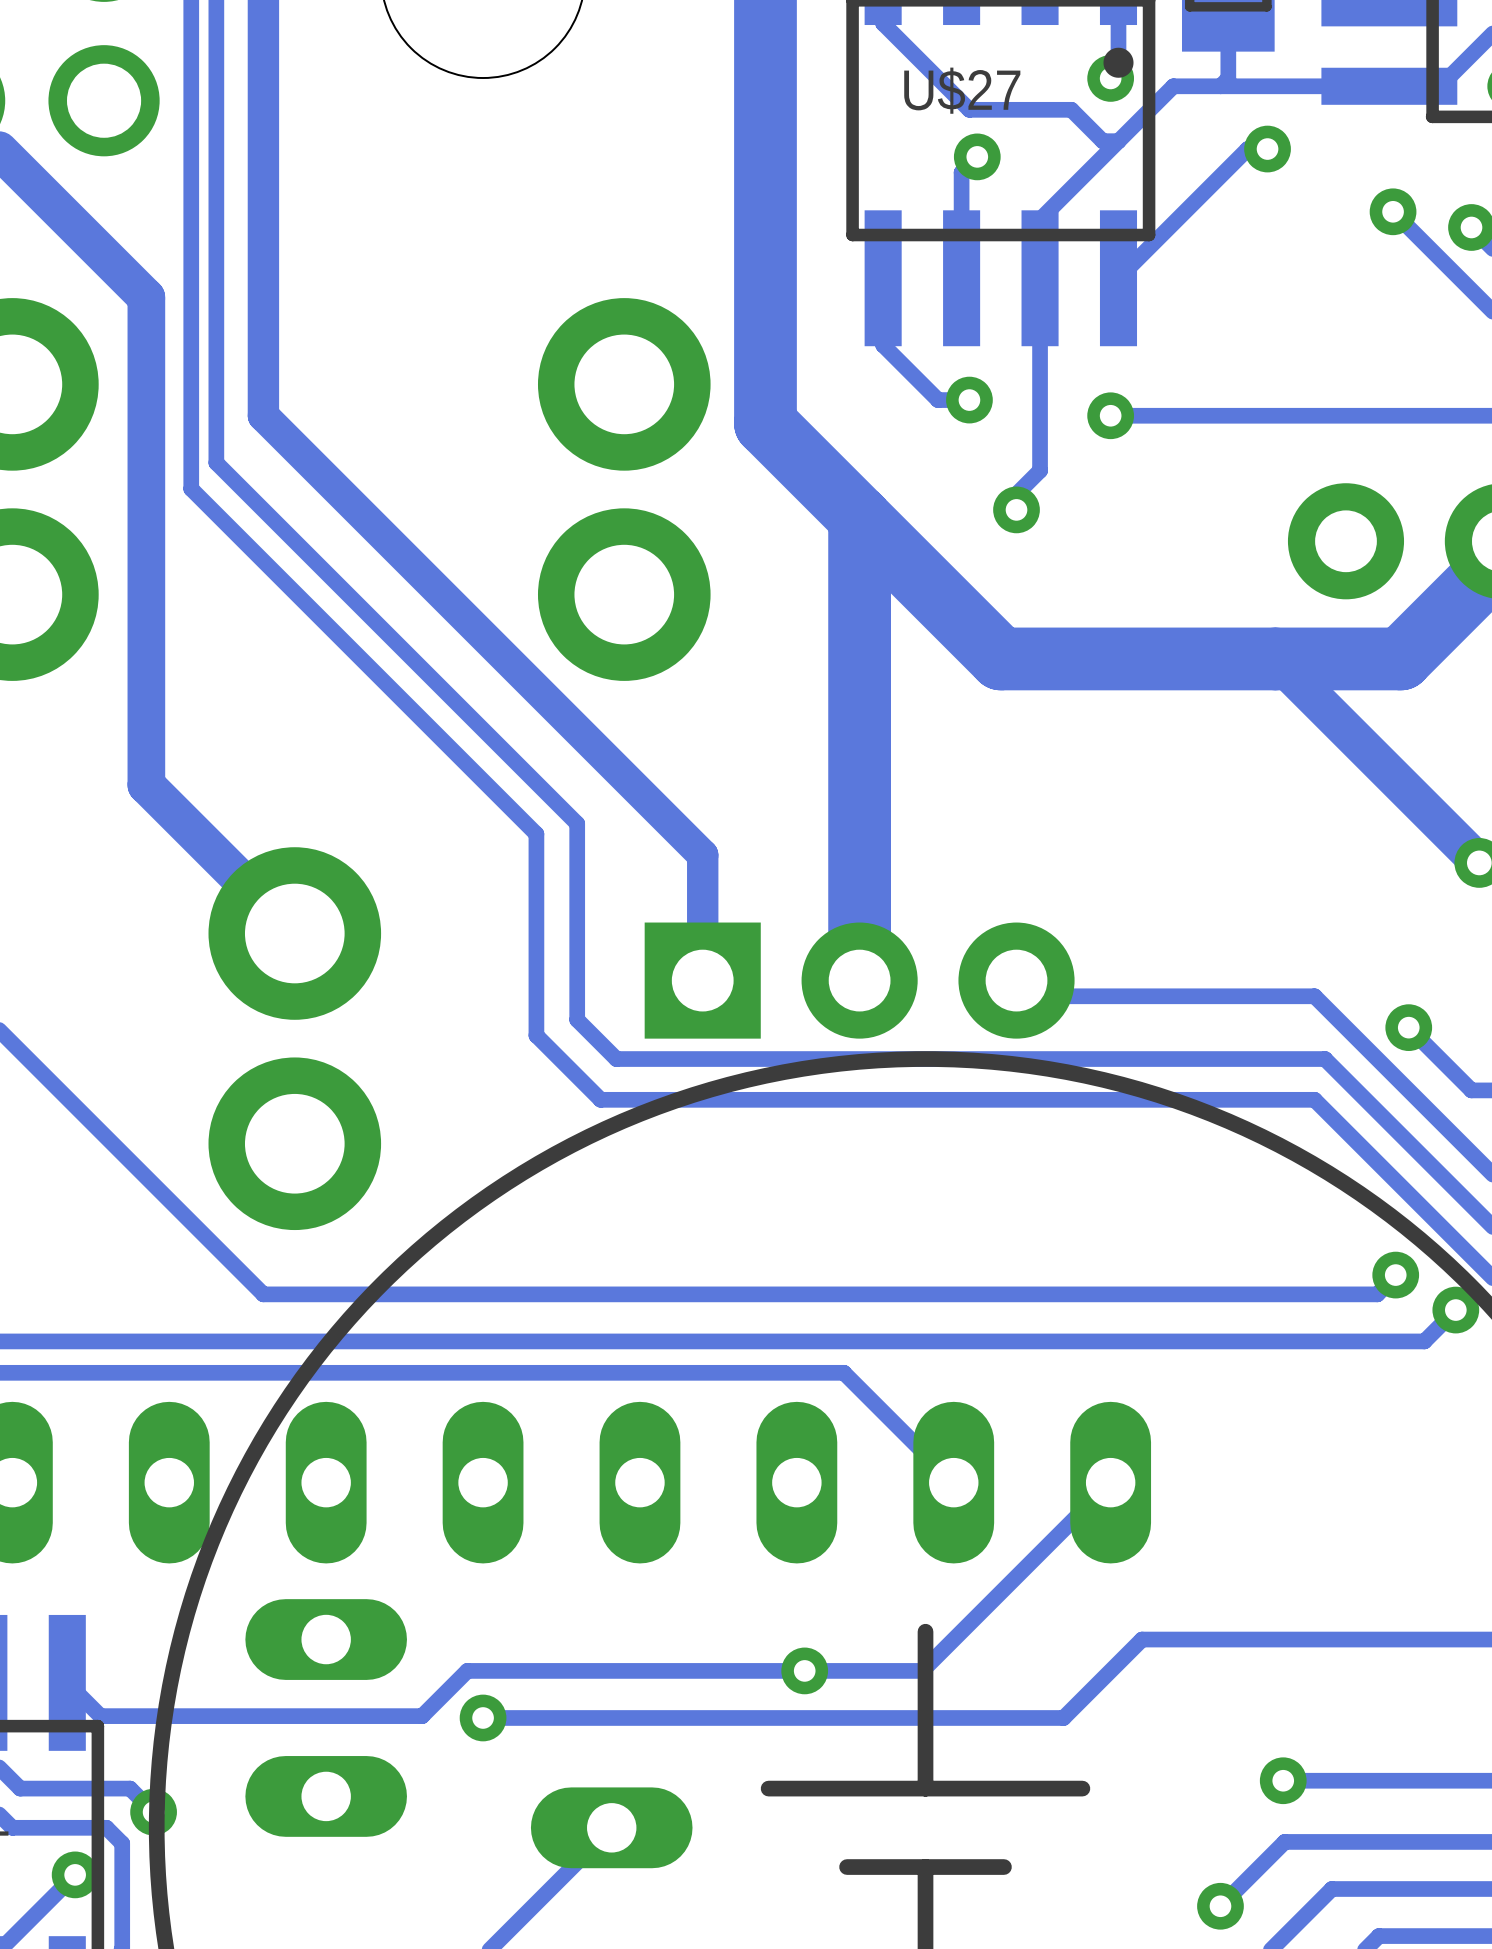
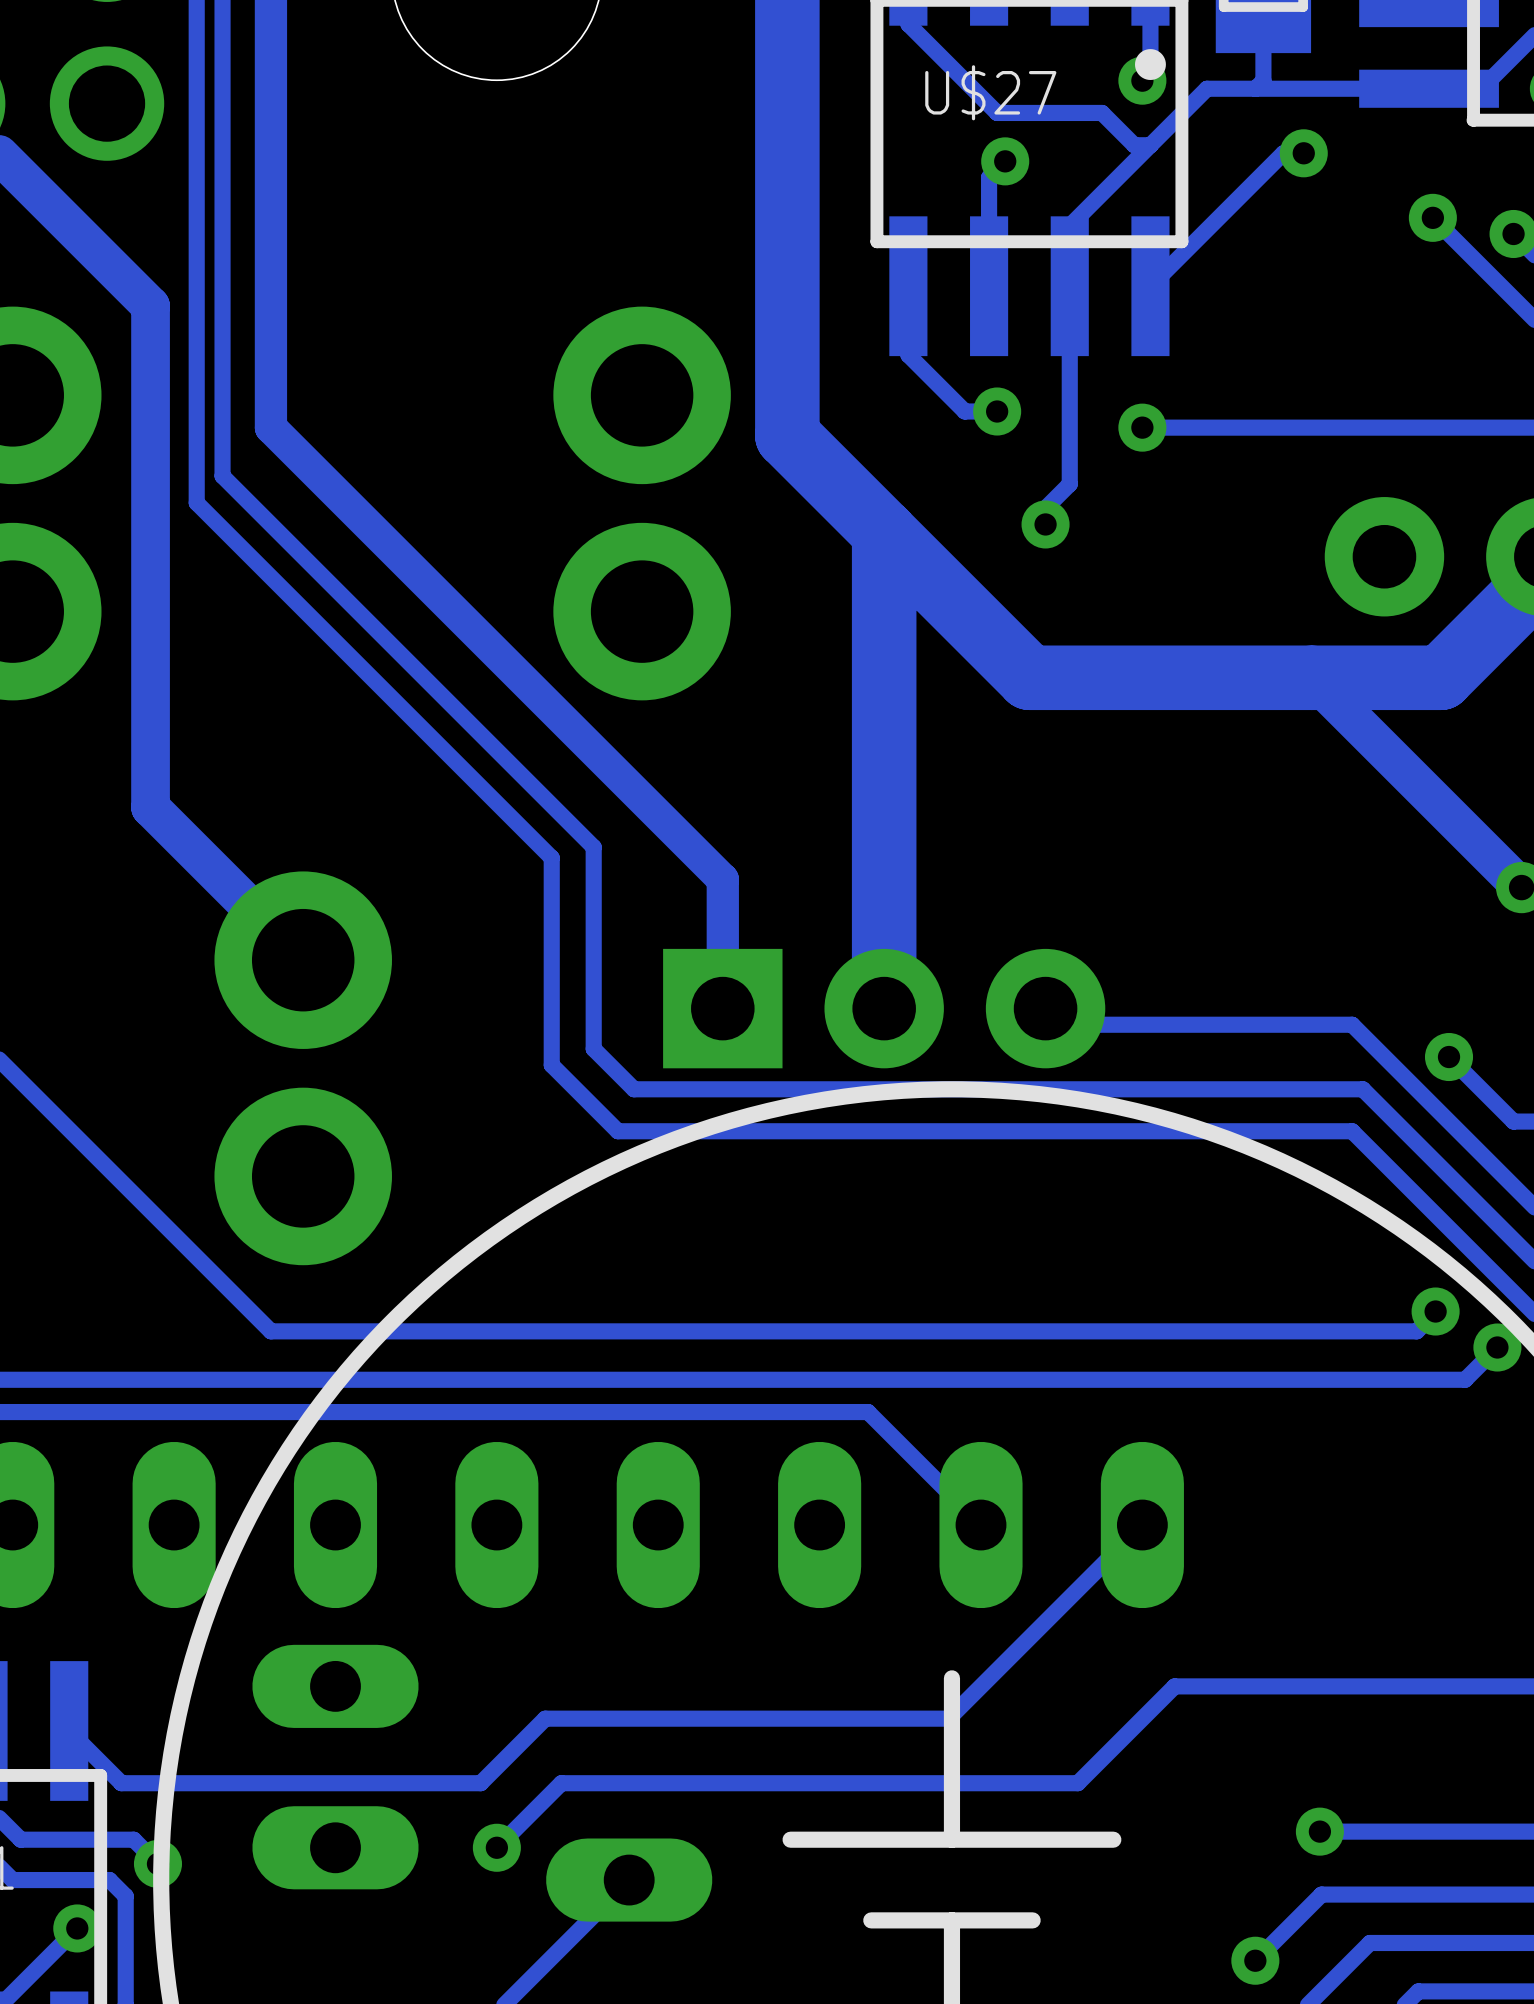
track: (530, 1670) (467, 1670) (422, 1716) (100, 1716) -> (545, 1718) (480, 1783) (121, 1783) (103, 1765)
via: (804, 1670) -> none
via position: (483, 1717) -> (496, 1847)
track: (1063, 1717) (483, 1717) -> (1093, 1767) (1077, 1783) (561, 1783) (496, 1847)

